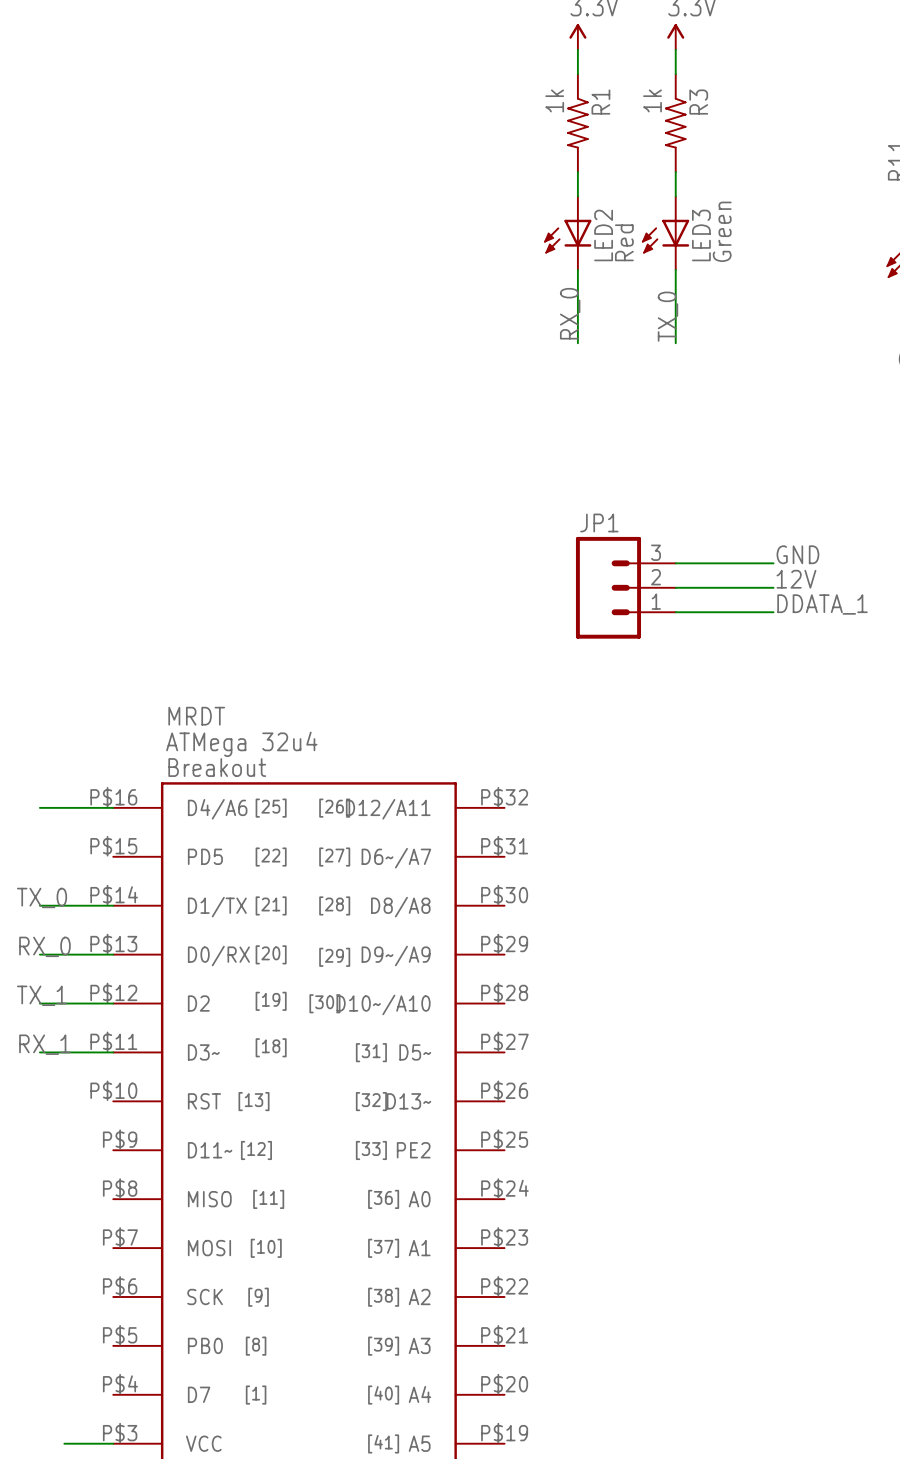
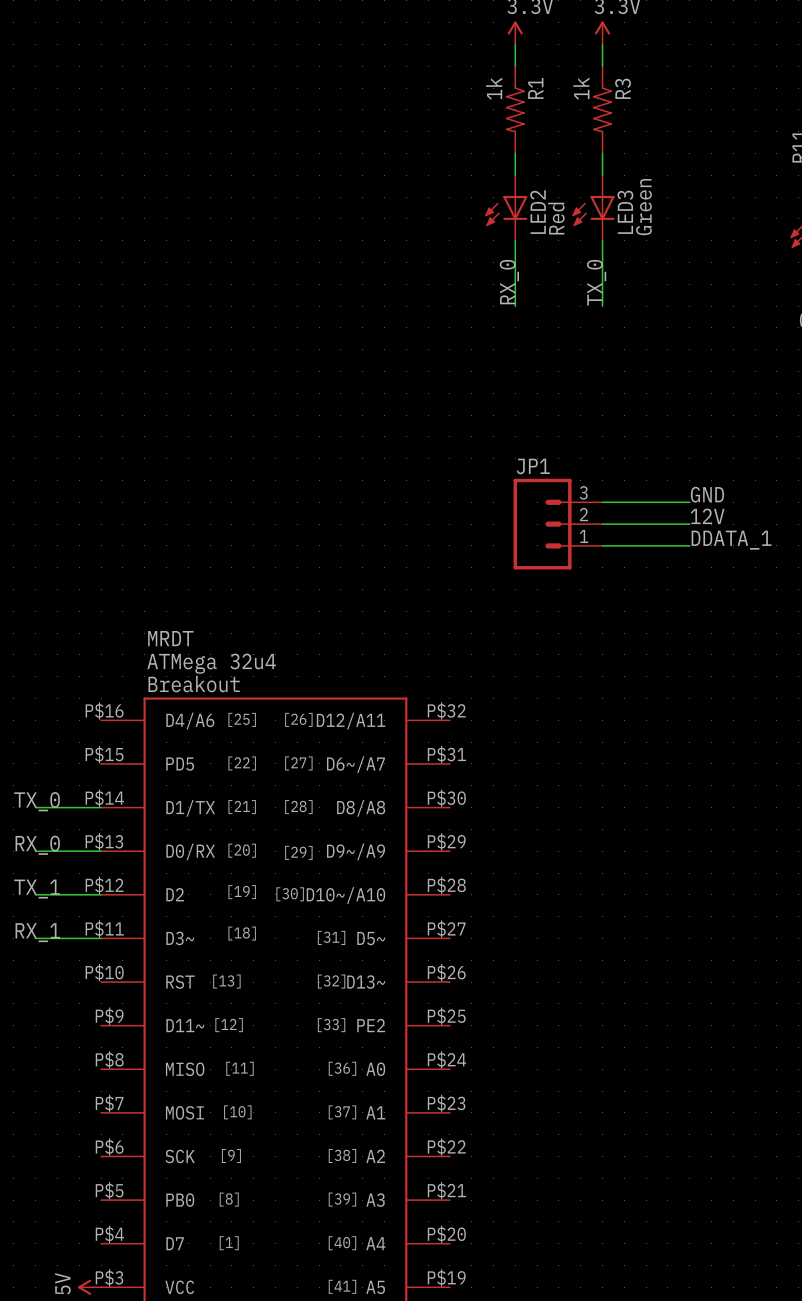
wire: (39, 807) (113, 807) -> none
power symbol: none -> 5V (89, 1287)

